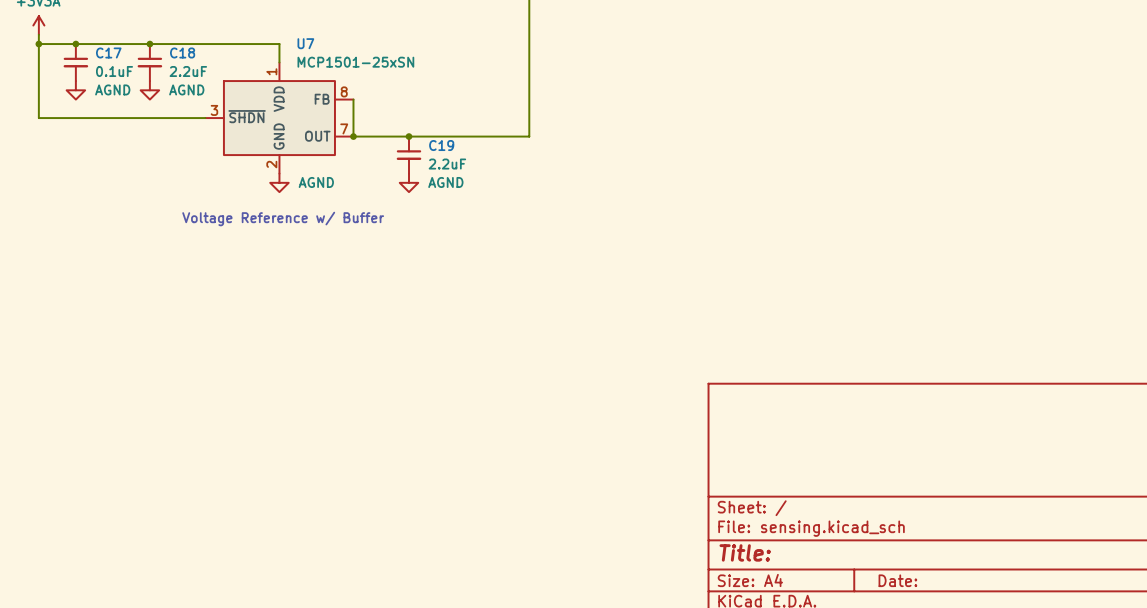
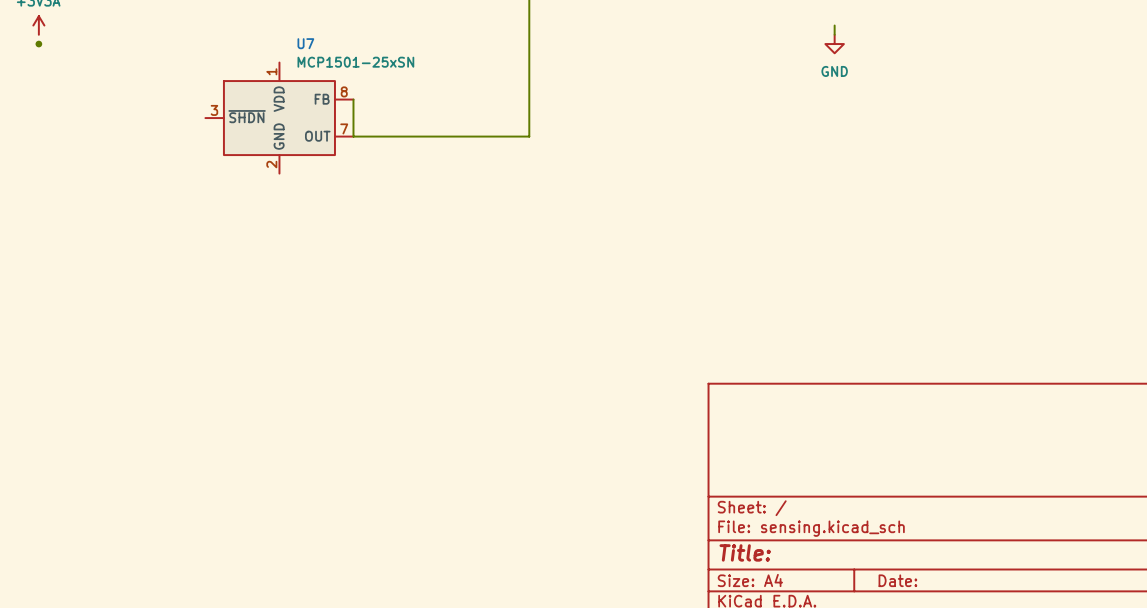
wire: none -> (834, 25) (834, 34)
wire: (38, 34) (38, 118) (205, 118) -> none
wire: (38, 44) (279, 44) (279, 62) -> none
junction: (75, 44) -> none
junction: (149, 44) -> none
power symbol: none -> GND (834, 44)
C17: 0.1uF (75, 62) -> none
C18: 2.2uF (149, 62) -> none
power symbol: AGND (75, 90) -> none
power symbol: AGND (149, 90) -> none
junction: (353, 136) -> none
junction: (409, 136) -> none
C19: 2.2uF (409, 155) -> none
power symbol: AGND (279, 182) -> none
power symbol: AGND (409, 182) -> none
text: Voltage Reference w/ Buffer (283, 219) -> none

